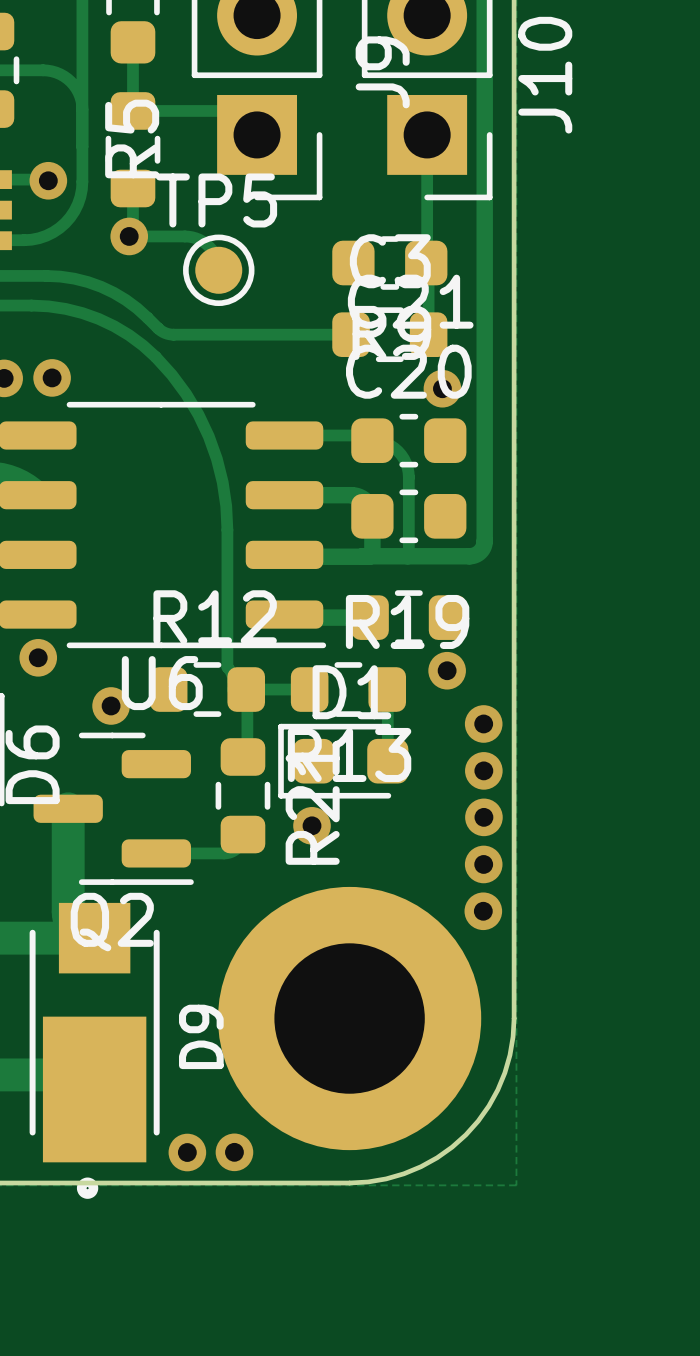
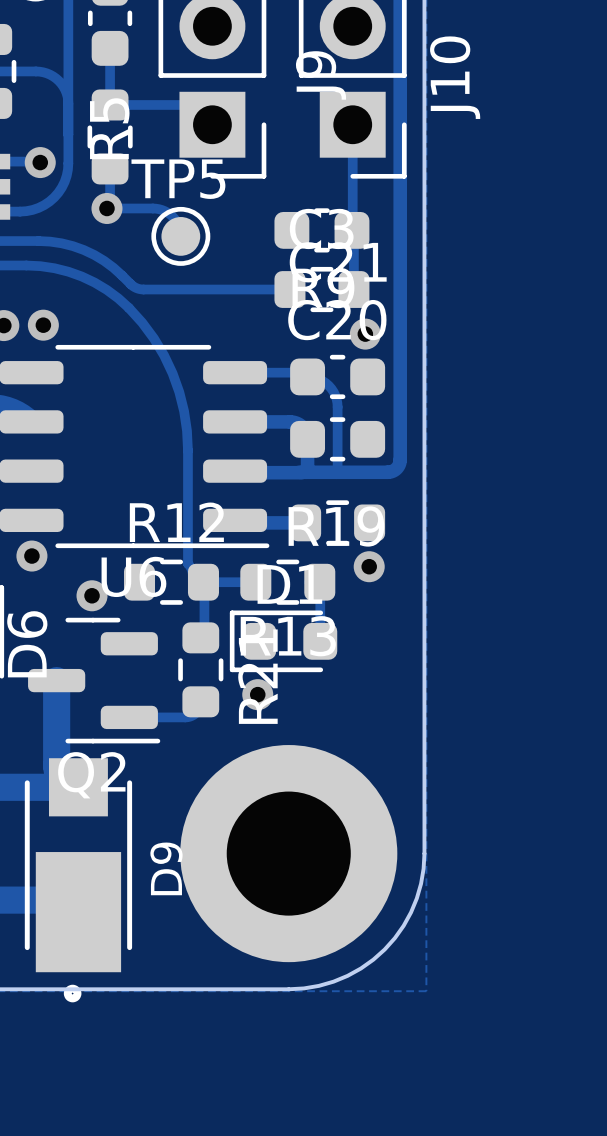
via: (483, 723) -> none
via: (483, 770) -> none
via: (483, 817) -> none
via: (483, 864) -> none
via: (483, 911) -> none
via: (187, 1152) -> none
via: (234, 1152) -> none

